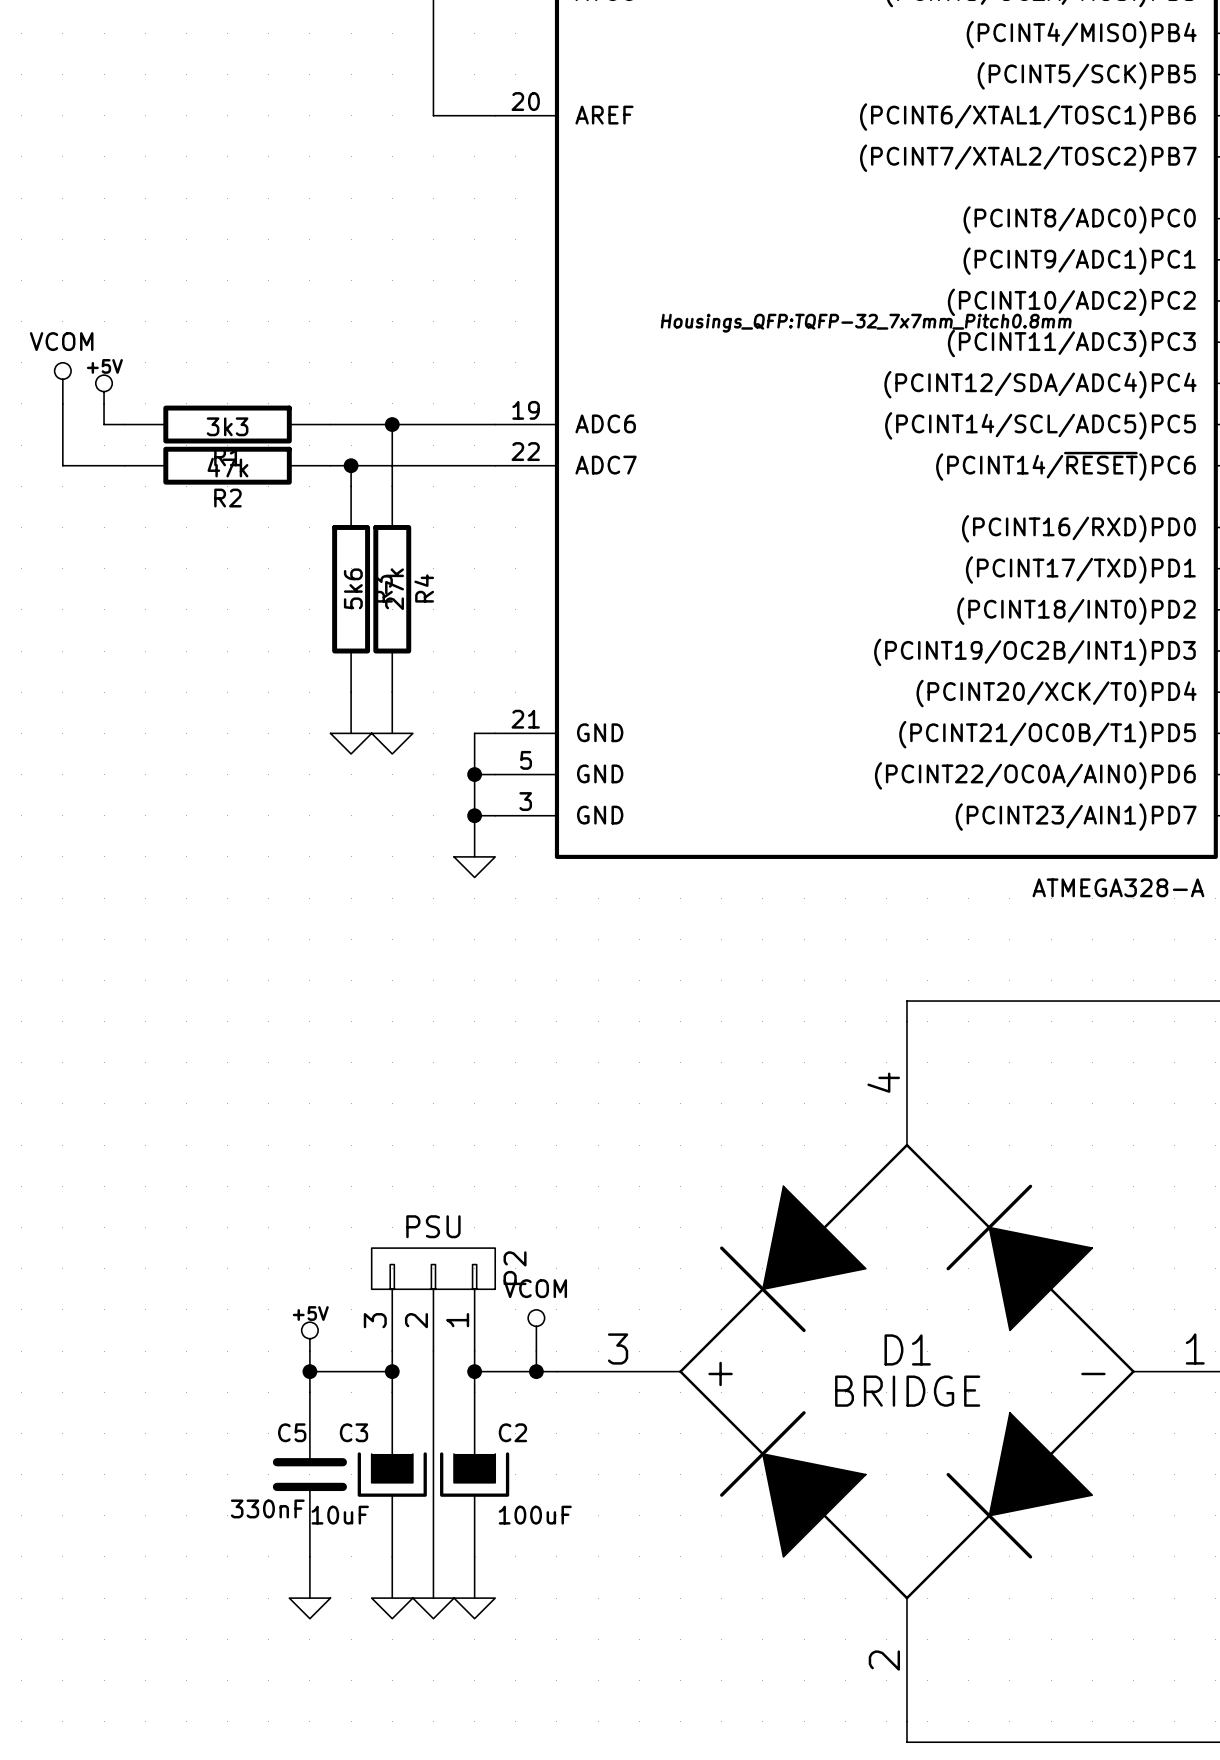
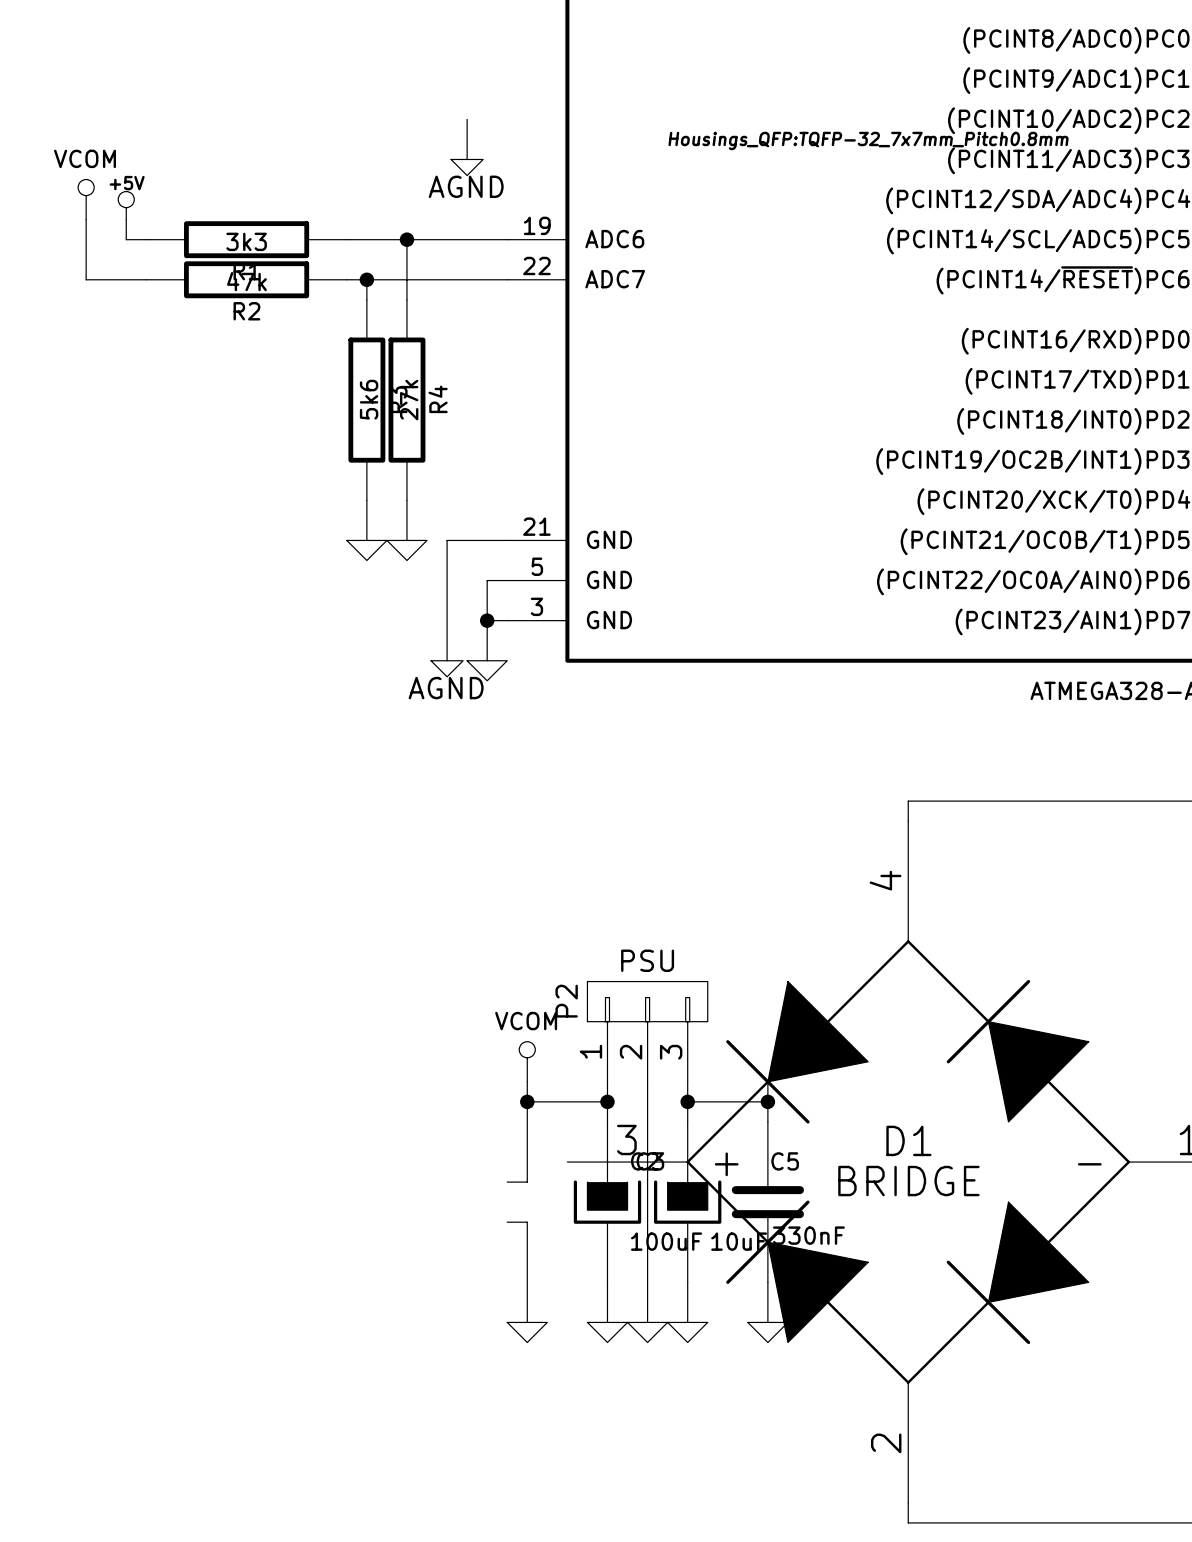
wire: none -> (467, 119) (467, 159)
power symbol: none -> AGND (467, 167)
wire: (474, 733) (474, 774) -> (487, 540) (447, 540) (447, 660)
junction: (474, 774) -> none
power symbol: none -> AGND (447, 668)
P2 flip: as is (433, 1268) -> left-right (647, 1001)
wire: none -> (527, 1081) (527, 1182) (507, 1182)
wire: none -> (767, 1081) (767, 1121)
P2 position: (433, 1299) -> (647, 1031)
junction: none -> (527, 1101)
junction: none -> (607, 1101)
junction: none -> (687, 1101)
junction: none -> (767, 1101)
power symbol position: VCOM (536, 1330) -> VCOM (527, 1061)
power symbol: +5V (309, 1336) -> none
wire: (309, 1351) (309, 1392) -> none
wire: (392, 1351) (392, 1392) -> (607, 1081) (607, 1121)
wire: (433, 1351) (433, 1598) -> (647, 1081) (647, 1322)
wire: (474, 1351) (474, 1392) -> (687, 1081) (687, 1121)
wire: (536, 1351) (536, 1371) -> none
wire: (309, 1371) (392, 1371) -> (527, 1101) (607, 1101)
junction: (309, 1371) -> none
junction: (392, 1371) -> none
wire: (474, 1371) (556, 1371) -> (687, 1101) (767, 1101)
junction: (474, 1371) -> none
junction: (536, 1371) -> none
C5 name position: C5 (292, 1432) -> C5 (785, 1161)
wire: none -> (507, 1222) (527, 1222) (527, 1322)
C5 position: (309, 1474) -> (767, 1202)
C3 position: (392, 1474) -> (687, 1202)
C2 position: (474, 1474) -> (607, 1202)
wire: none -> (767, 1282) (767, 1322)
C5 value position: 330nF (267, 1508) -> 330nF (808, 1235)
C3 value position: 10uF (340, 1515) -> 10uF (739, 1241)
power symbol: none -> (527, 1332)
power symbol: none -> (607, 1332)
power symbol: none -> (647, 1332)
power symbol: none -> (687, 1332)
power symbol: none -> (767, 1332)
wire: (309, 1556) (309, 1598) -> none
wire: (392, 1556) (392, 1598) -> (607, 1282) (607, 1322)
wire: (474, 1556) (474, 1598) -> (687, 1282) (687, 1322)
power symbol: (309, 1608) -> none
power symbol: (392, 1608) -> none
power symbol: (433, 1608) -> none
power symbol: (474, 1608) -> none

